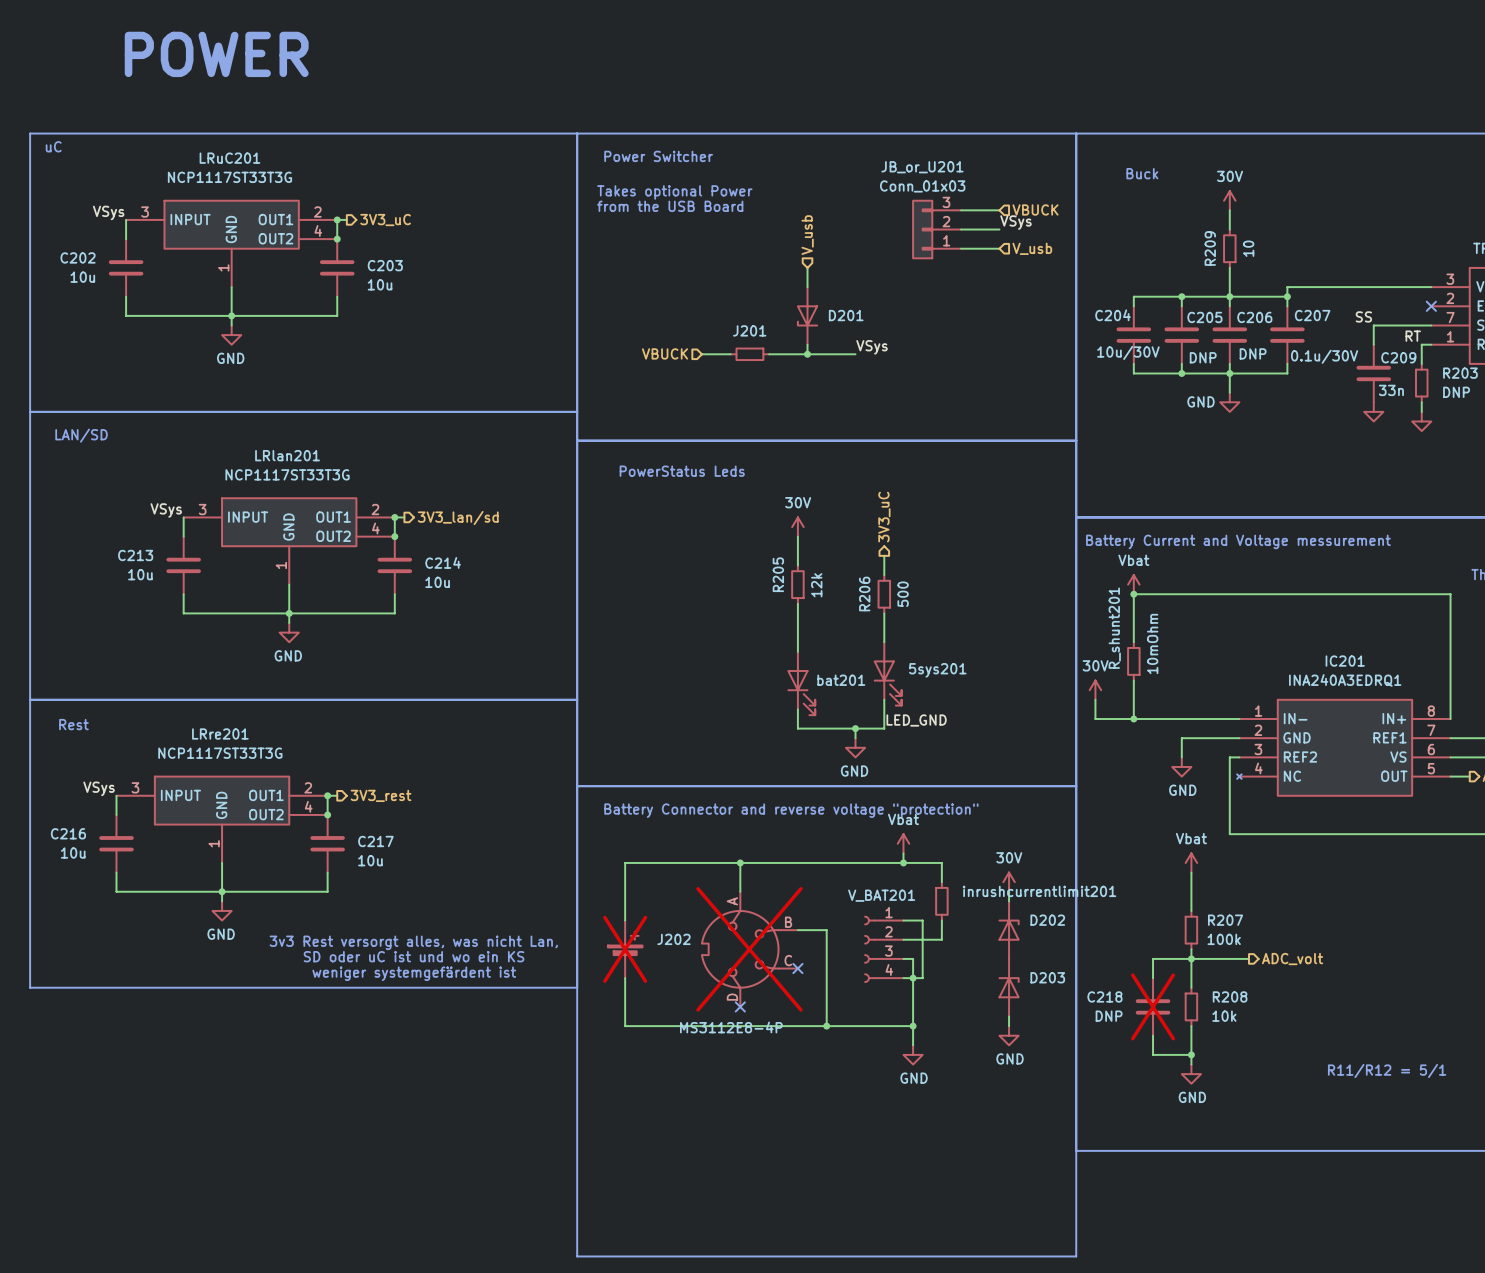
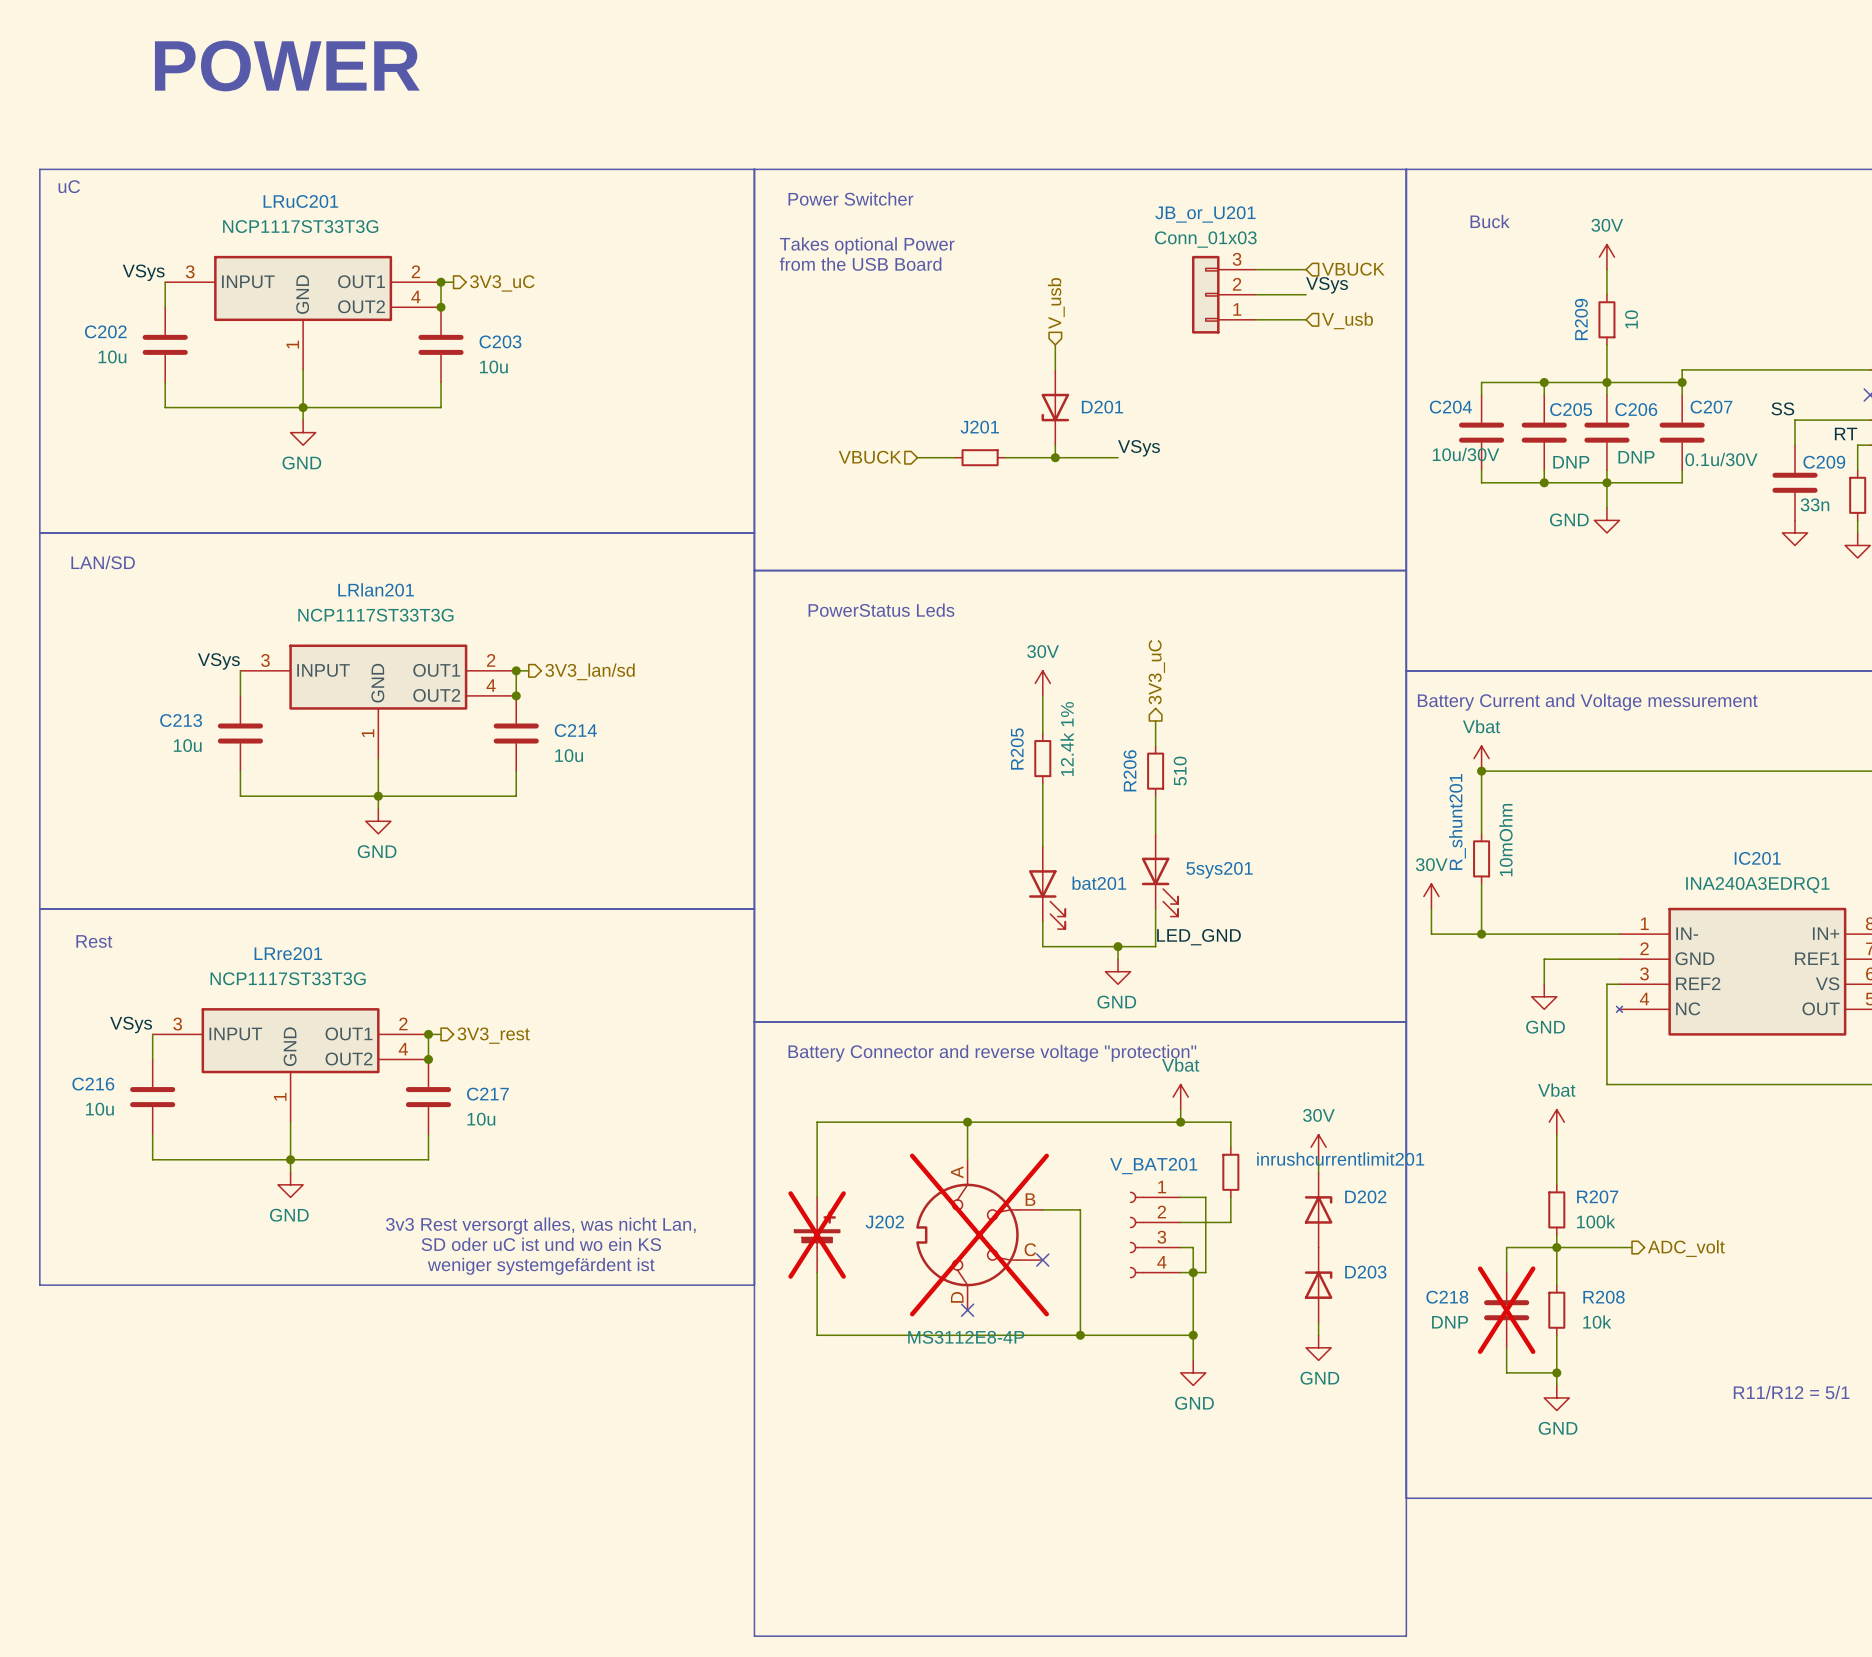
R205 value: 12k (816, 585) -> 12.4k 1% (1067, 739)
R206 value: 500 (903, 594) -> 510 (1180, 771)

